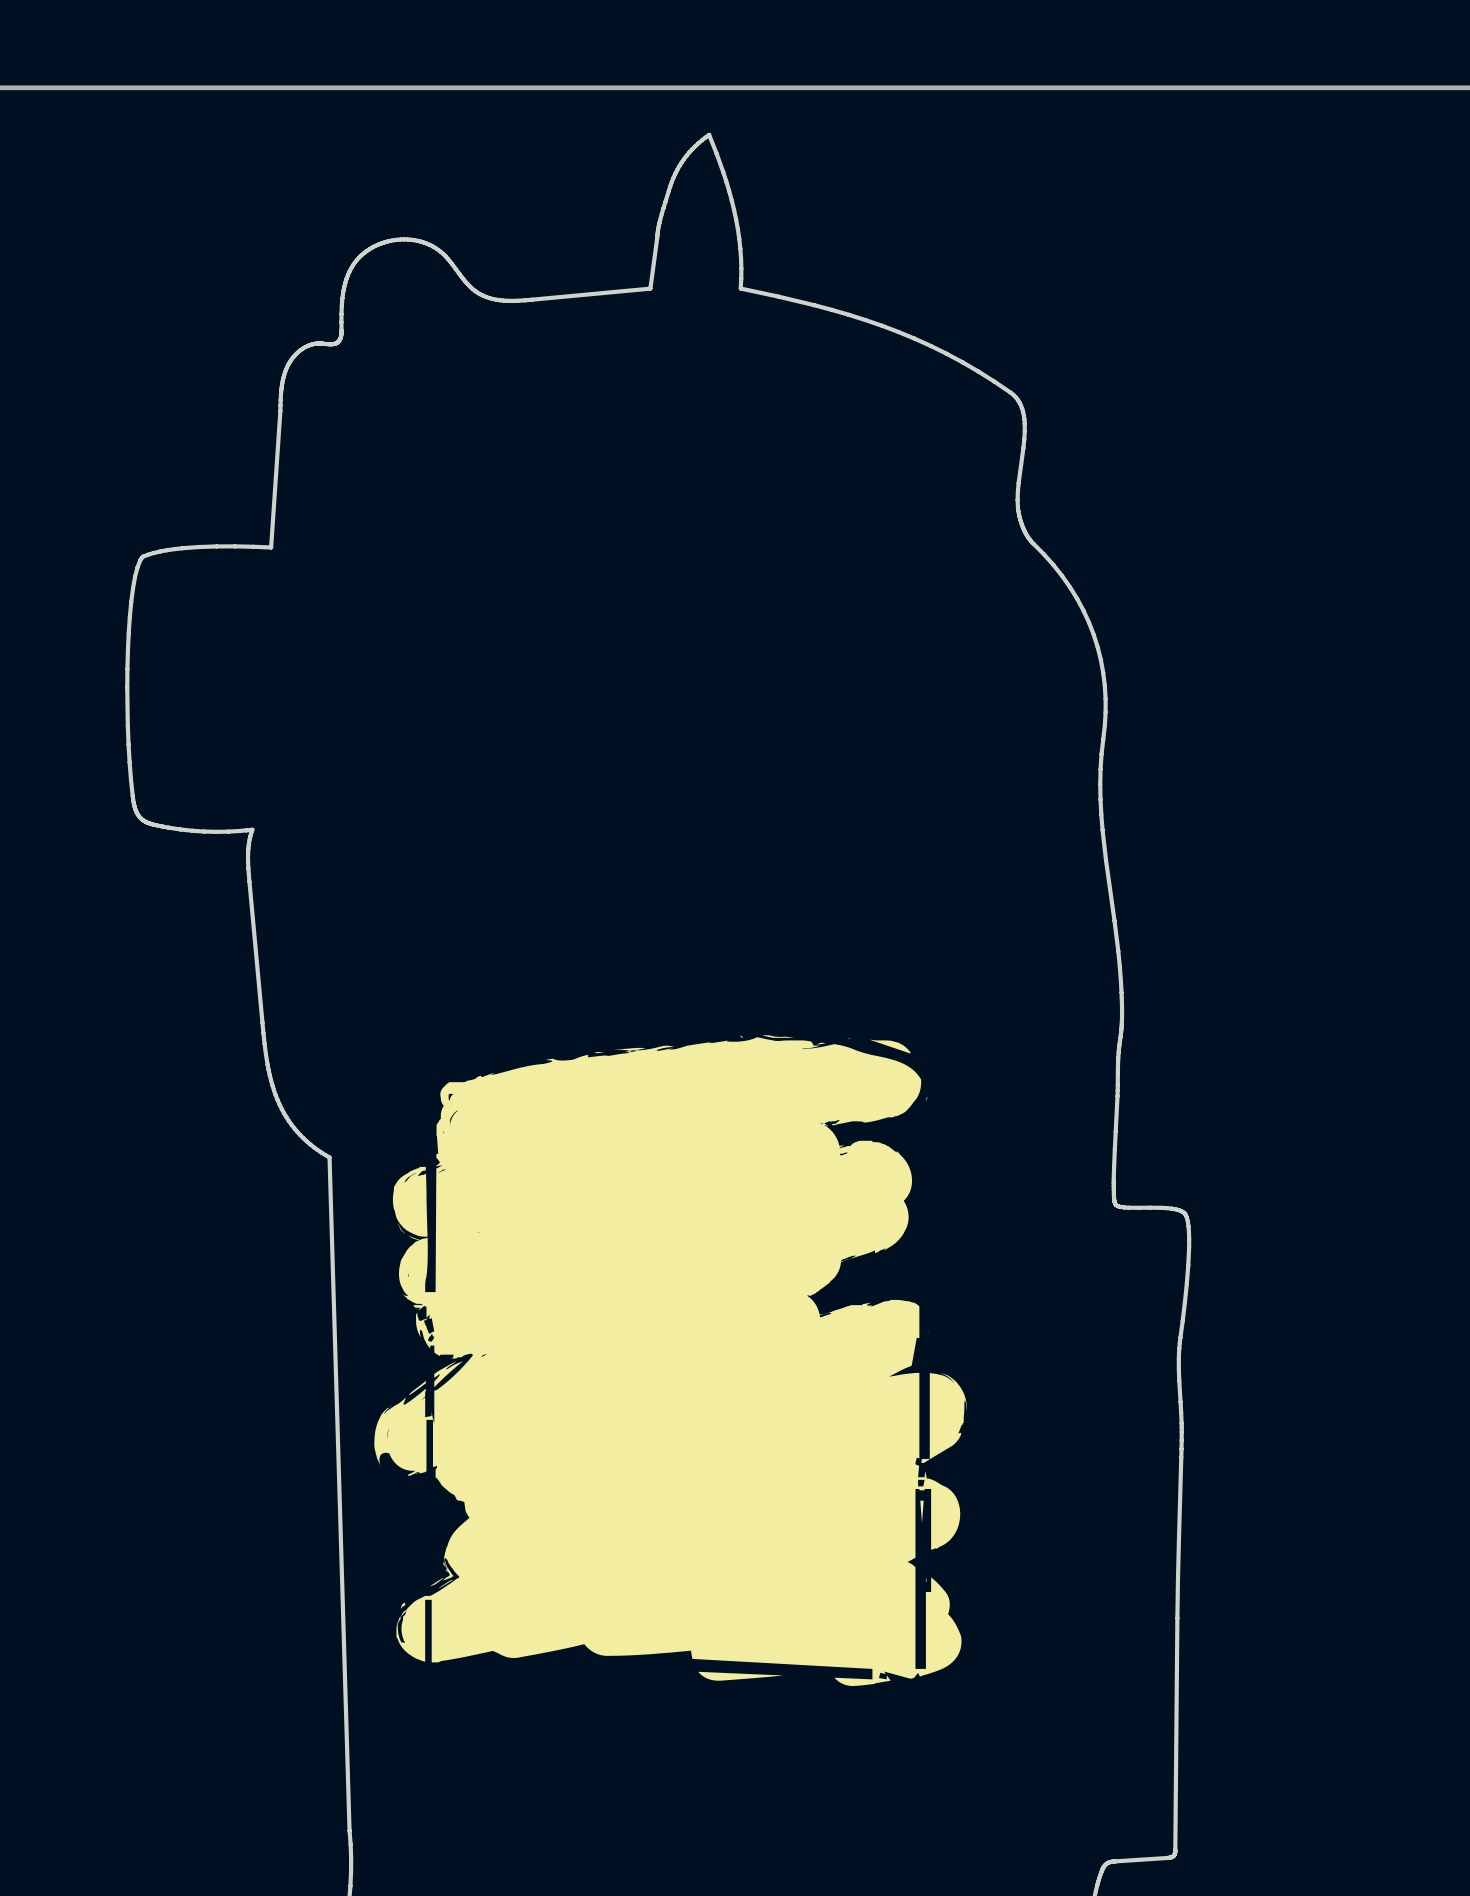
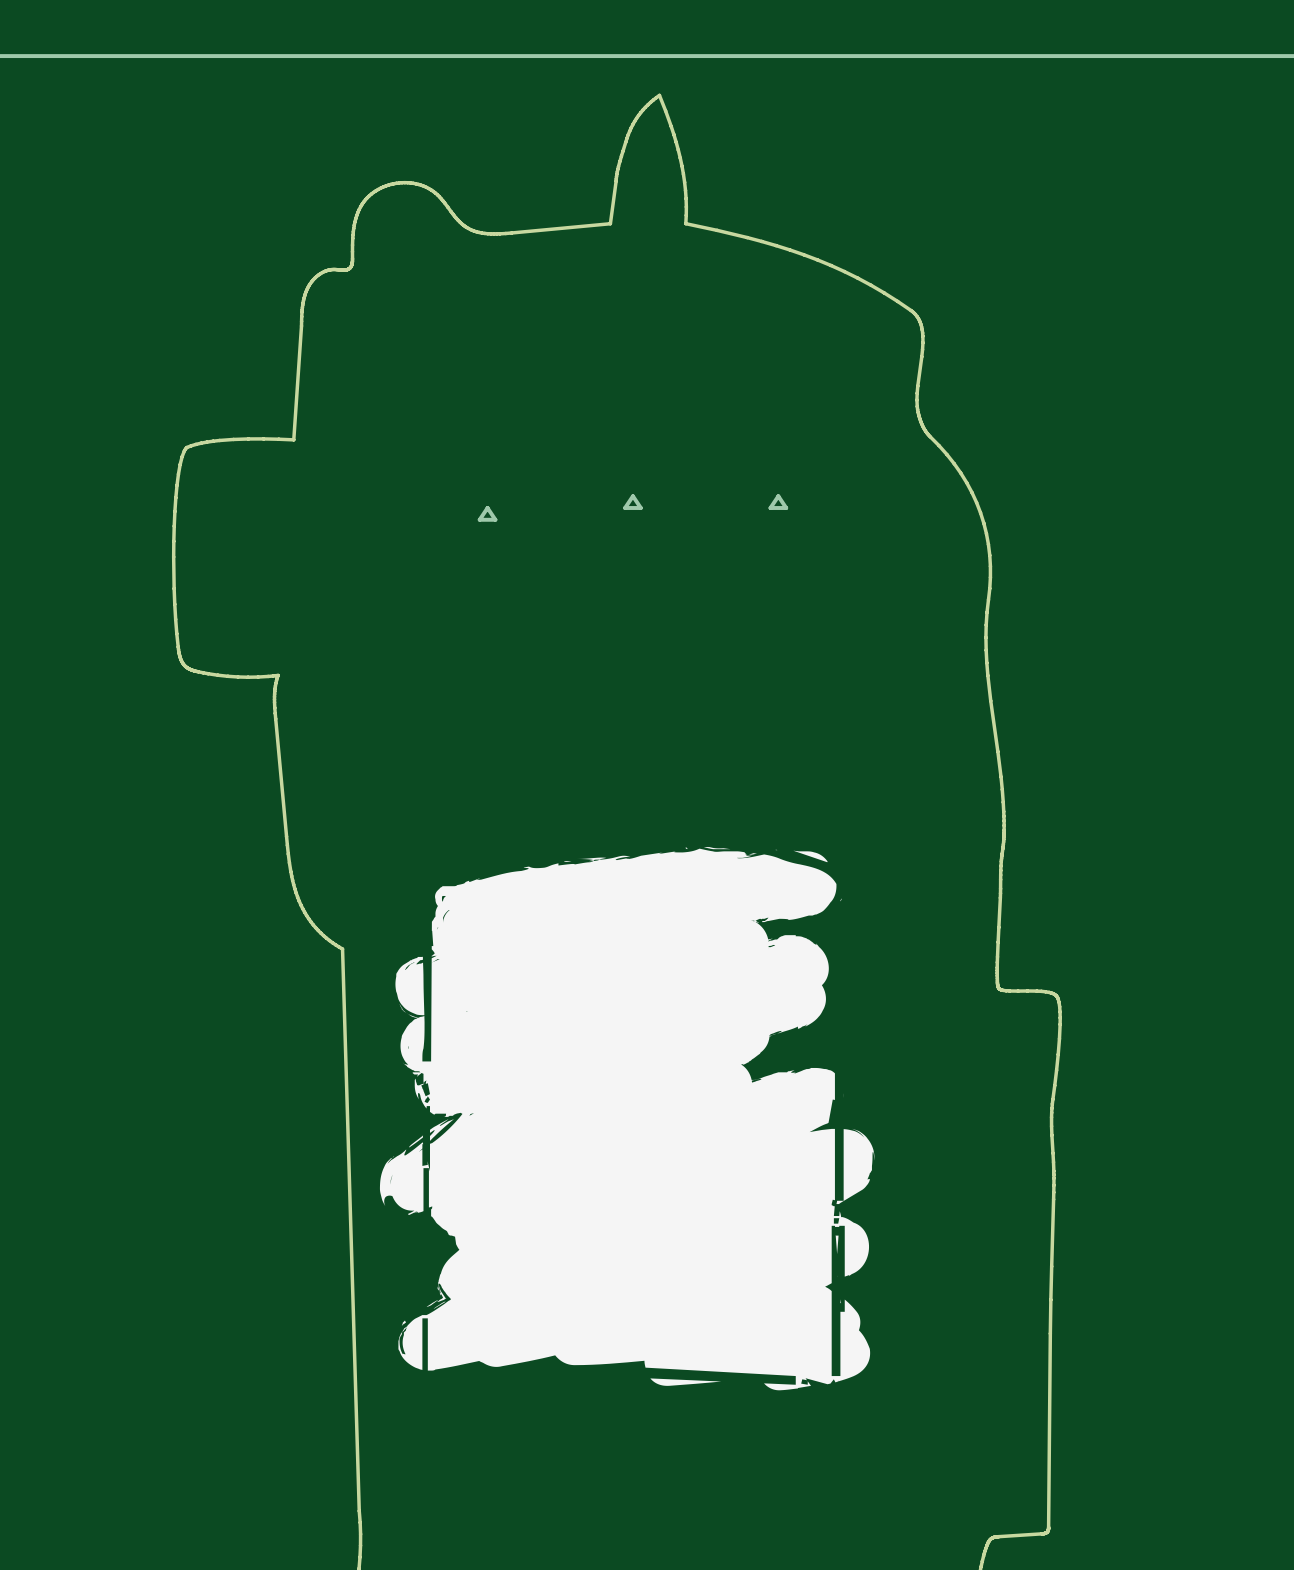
line: none -> (632, 496) (625, 508) (640, 508) (632, 496)
line: none -> (778, 496) (786, 508) (770, 508) (778, 496)
line: none -> (487, 508) (495, 519) (479, 519) (487, 508)

